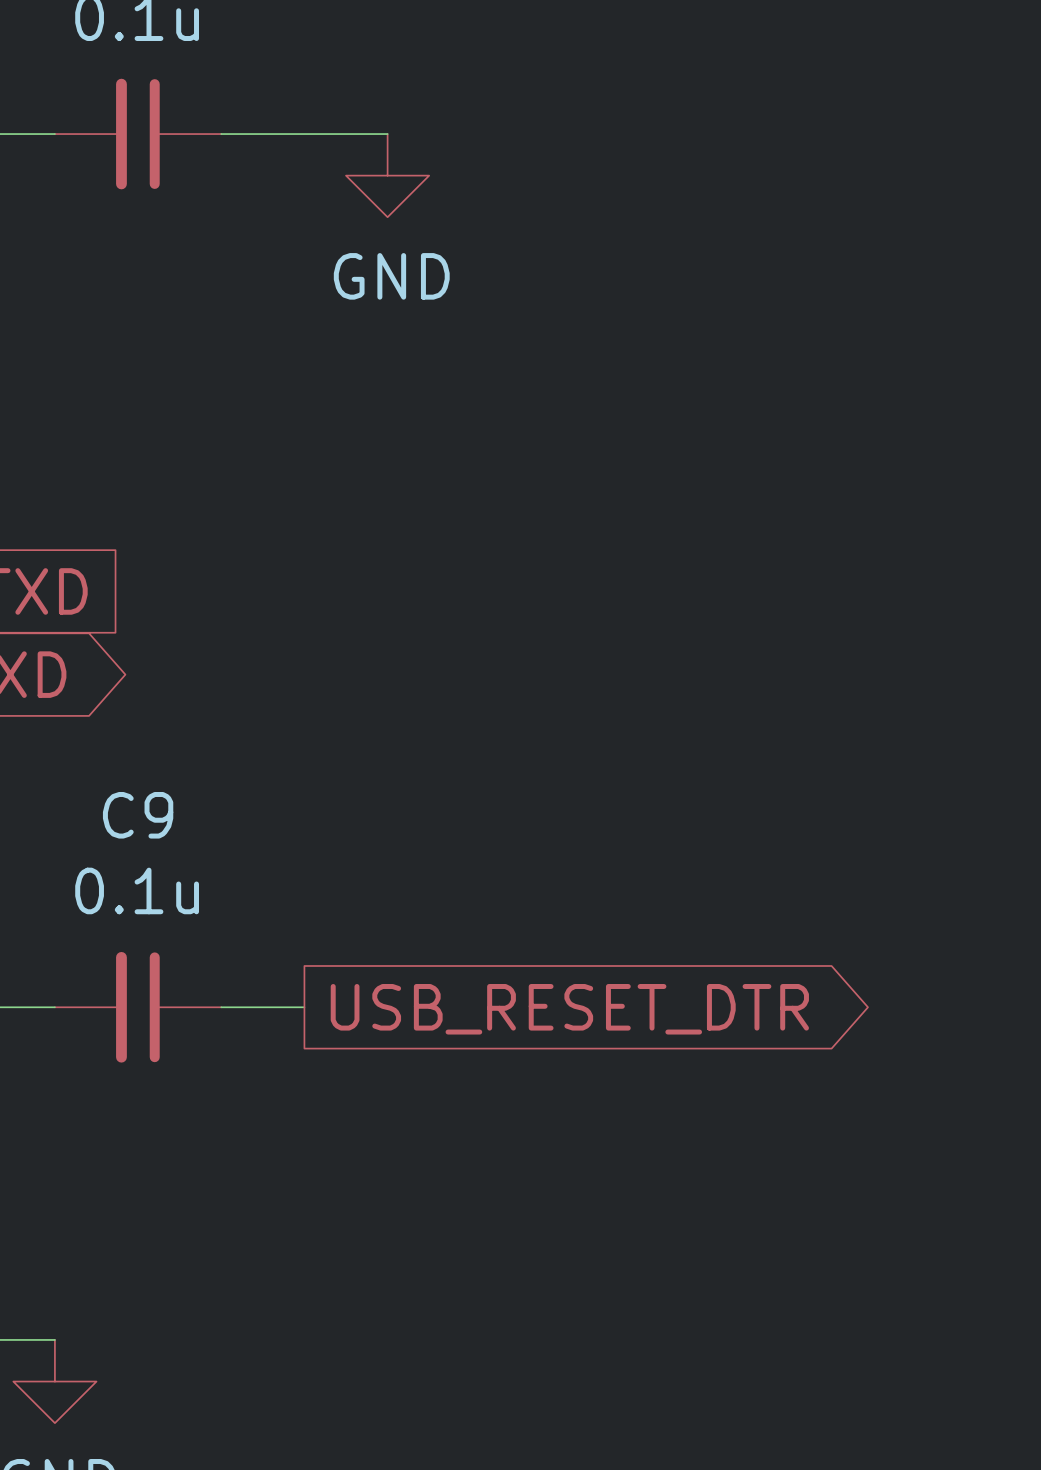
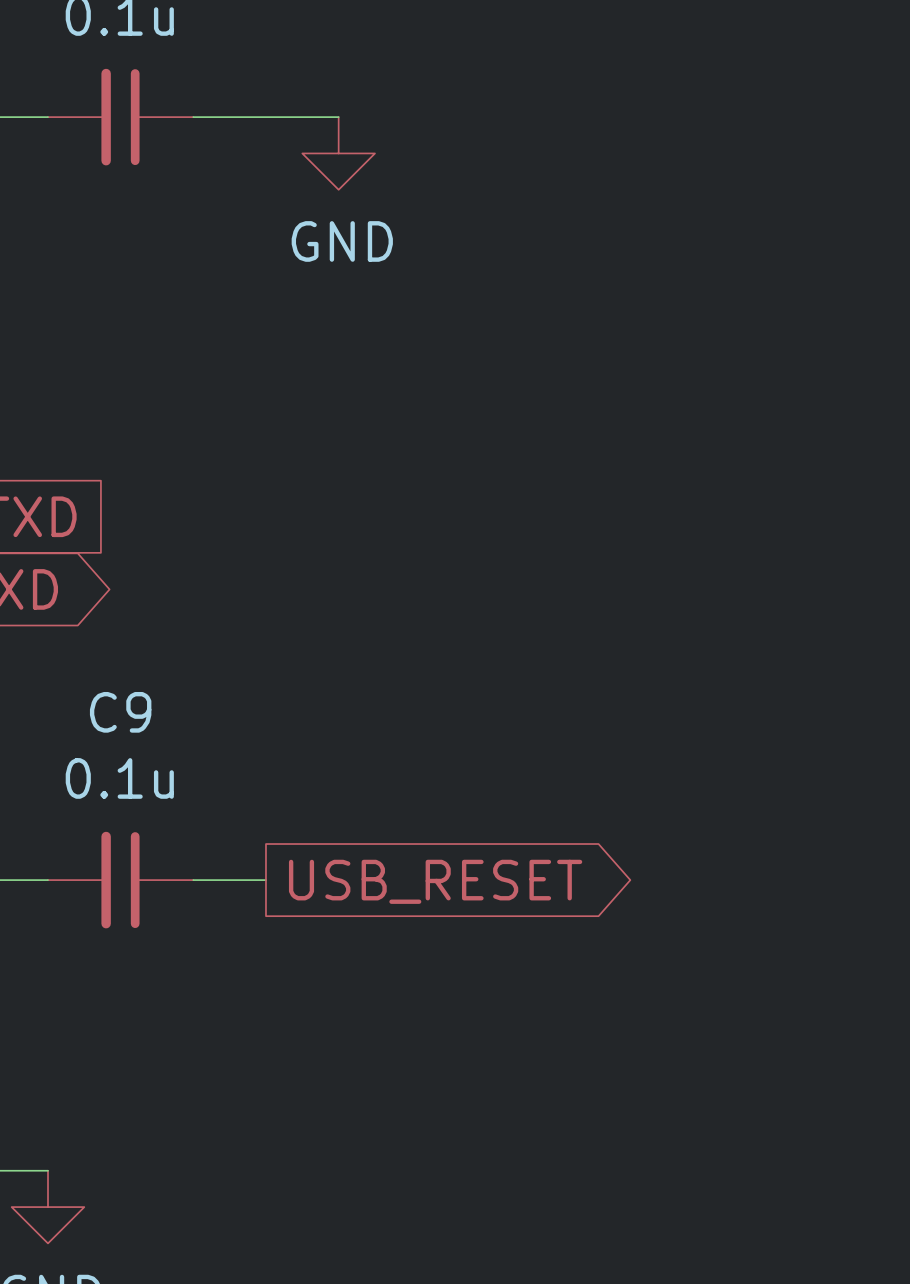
global label: USB_RESET_DTR (569, 1009) -> USB_RESET (435, 881)

